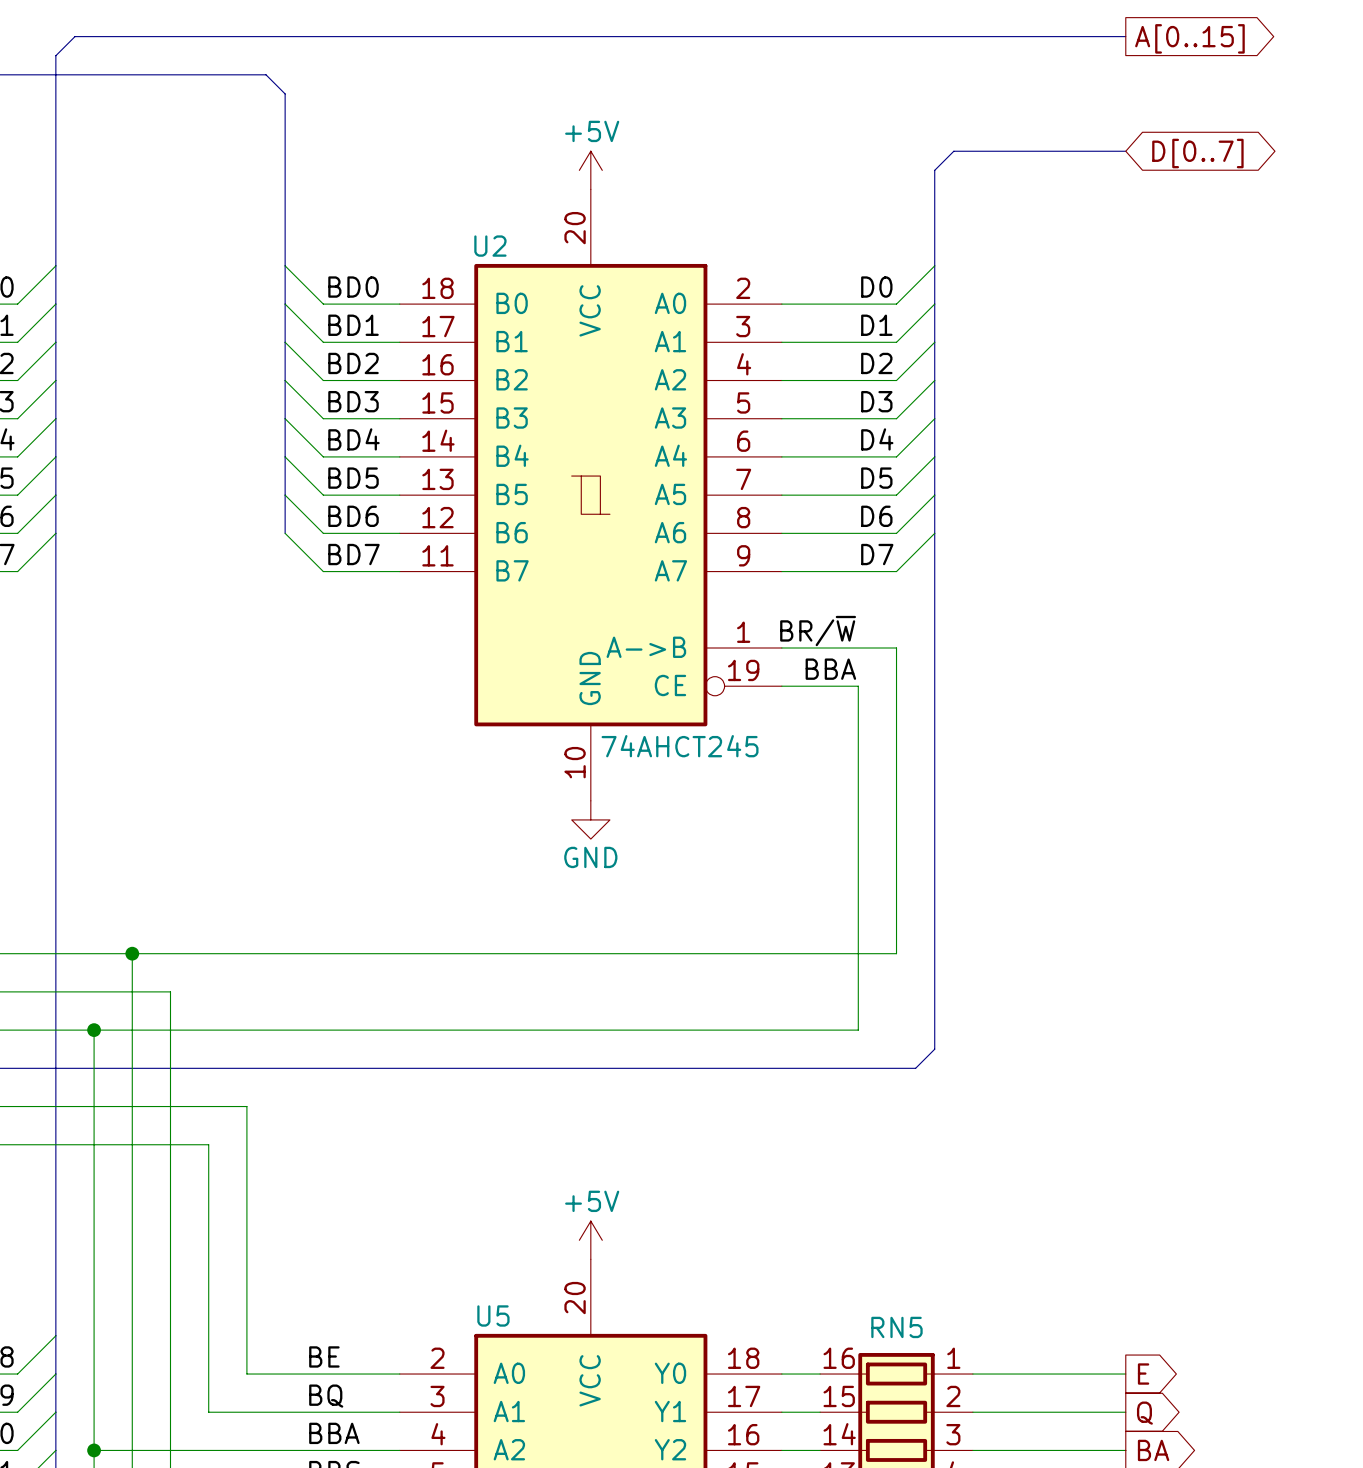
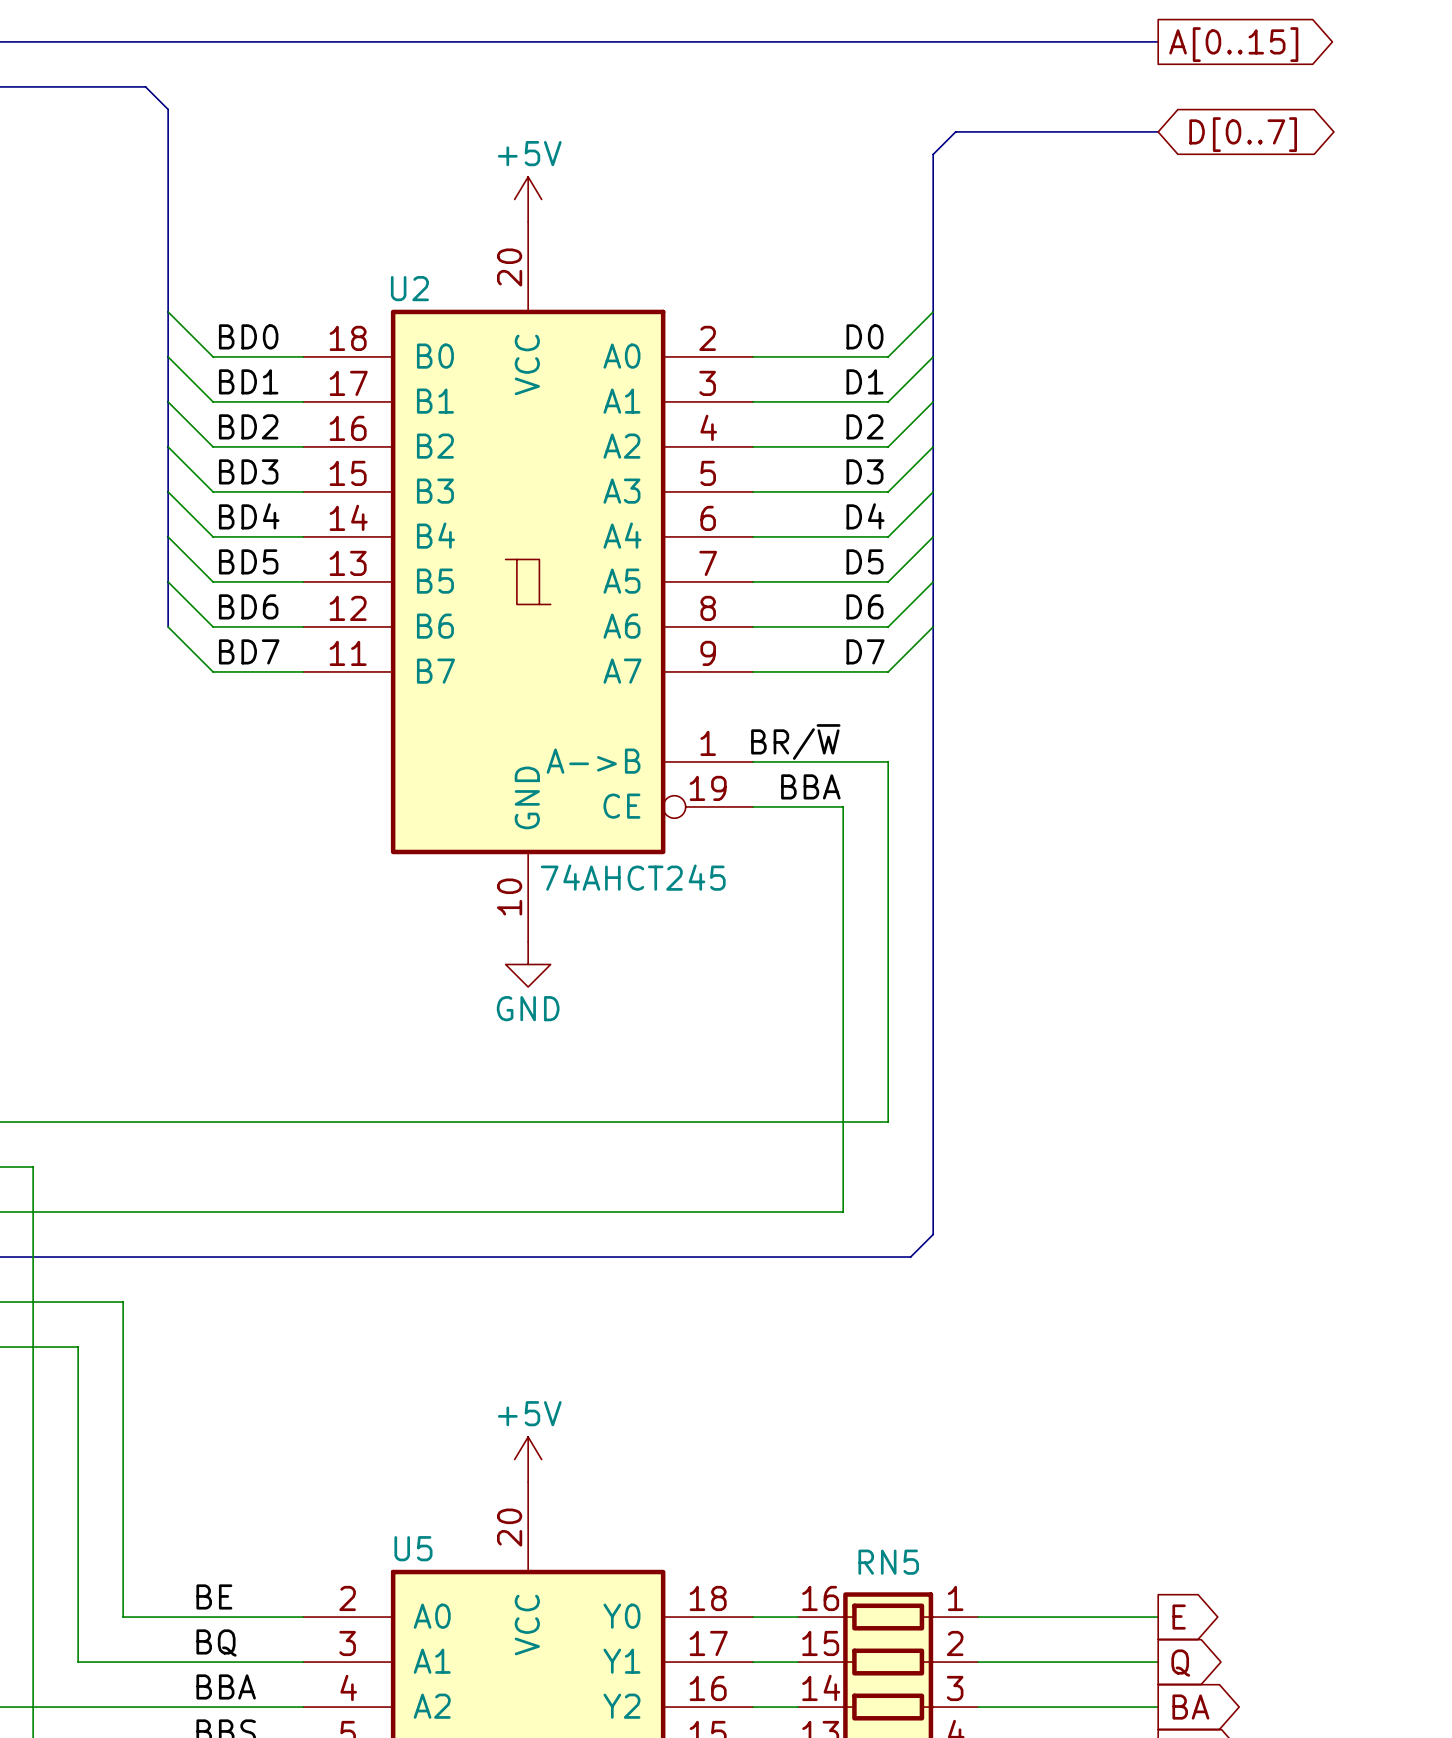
bus: (1125, 151) (953, 151) (934, 170) -> (1158, 131) (955, 131) (933, 154) (933, 199)
global label position: D[0..7] (1197, 153) -> D[0..7] (1243, 134)

